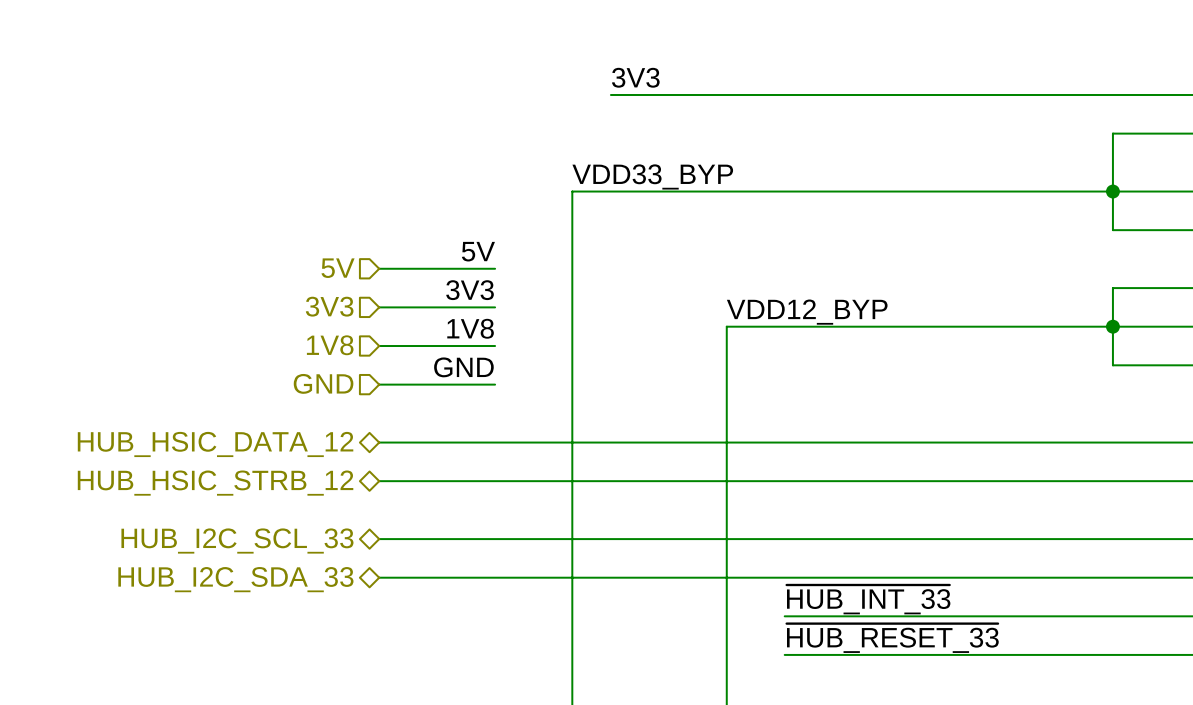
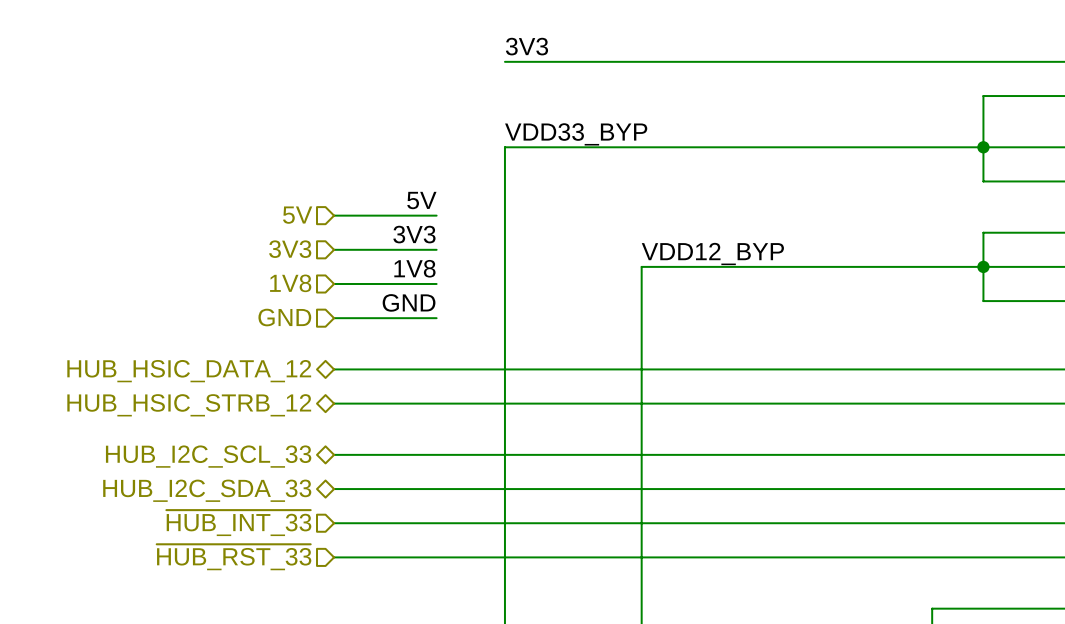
label position: 3V3 (635, 77) -> 3V3 (526, 46)
wire: none -> (504, 61) (539, 61)
label: ~{HUB_INT_33} (868, 599) -> none
hierarchical label: none -> ~{HUB_INT_33} (238, 523)
wire: none -> (334, 523) (692, 523)
label: ~{HUB_RESET_33} (892, 638) -> none
hierarchical label: none -> ~{HUB_RST_33} (234, 557)
wire: none -> (334, 557) (692, 557)

